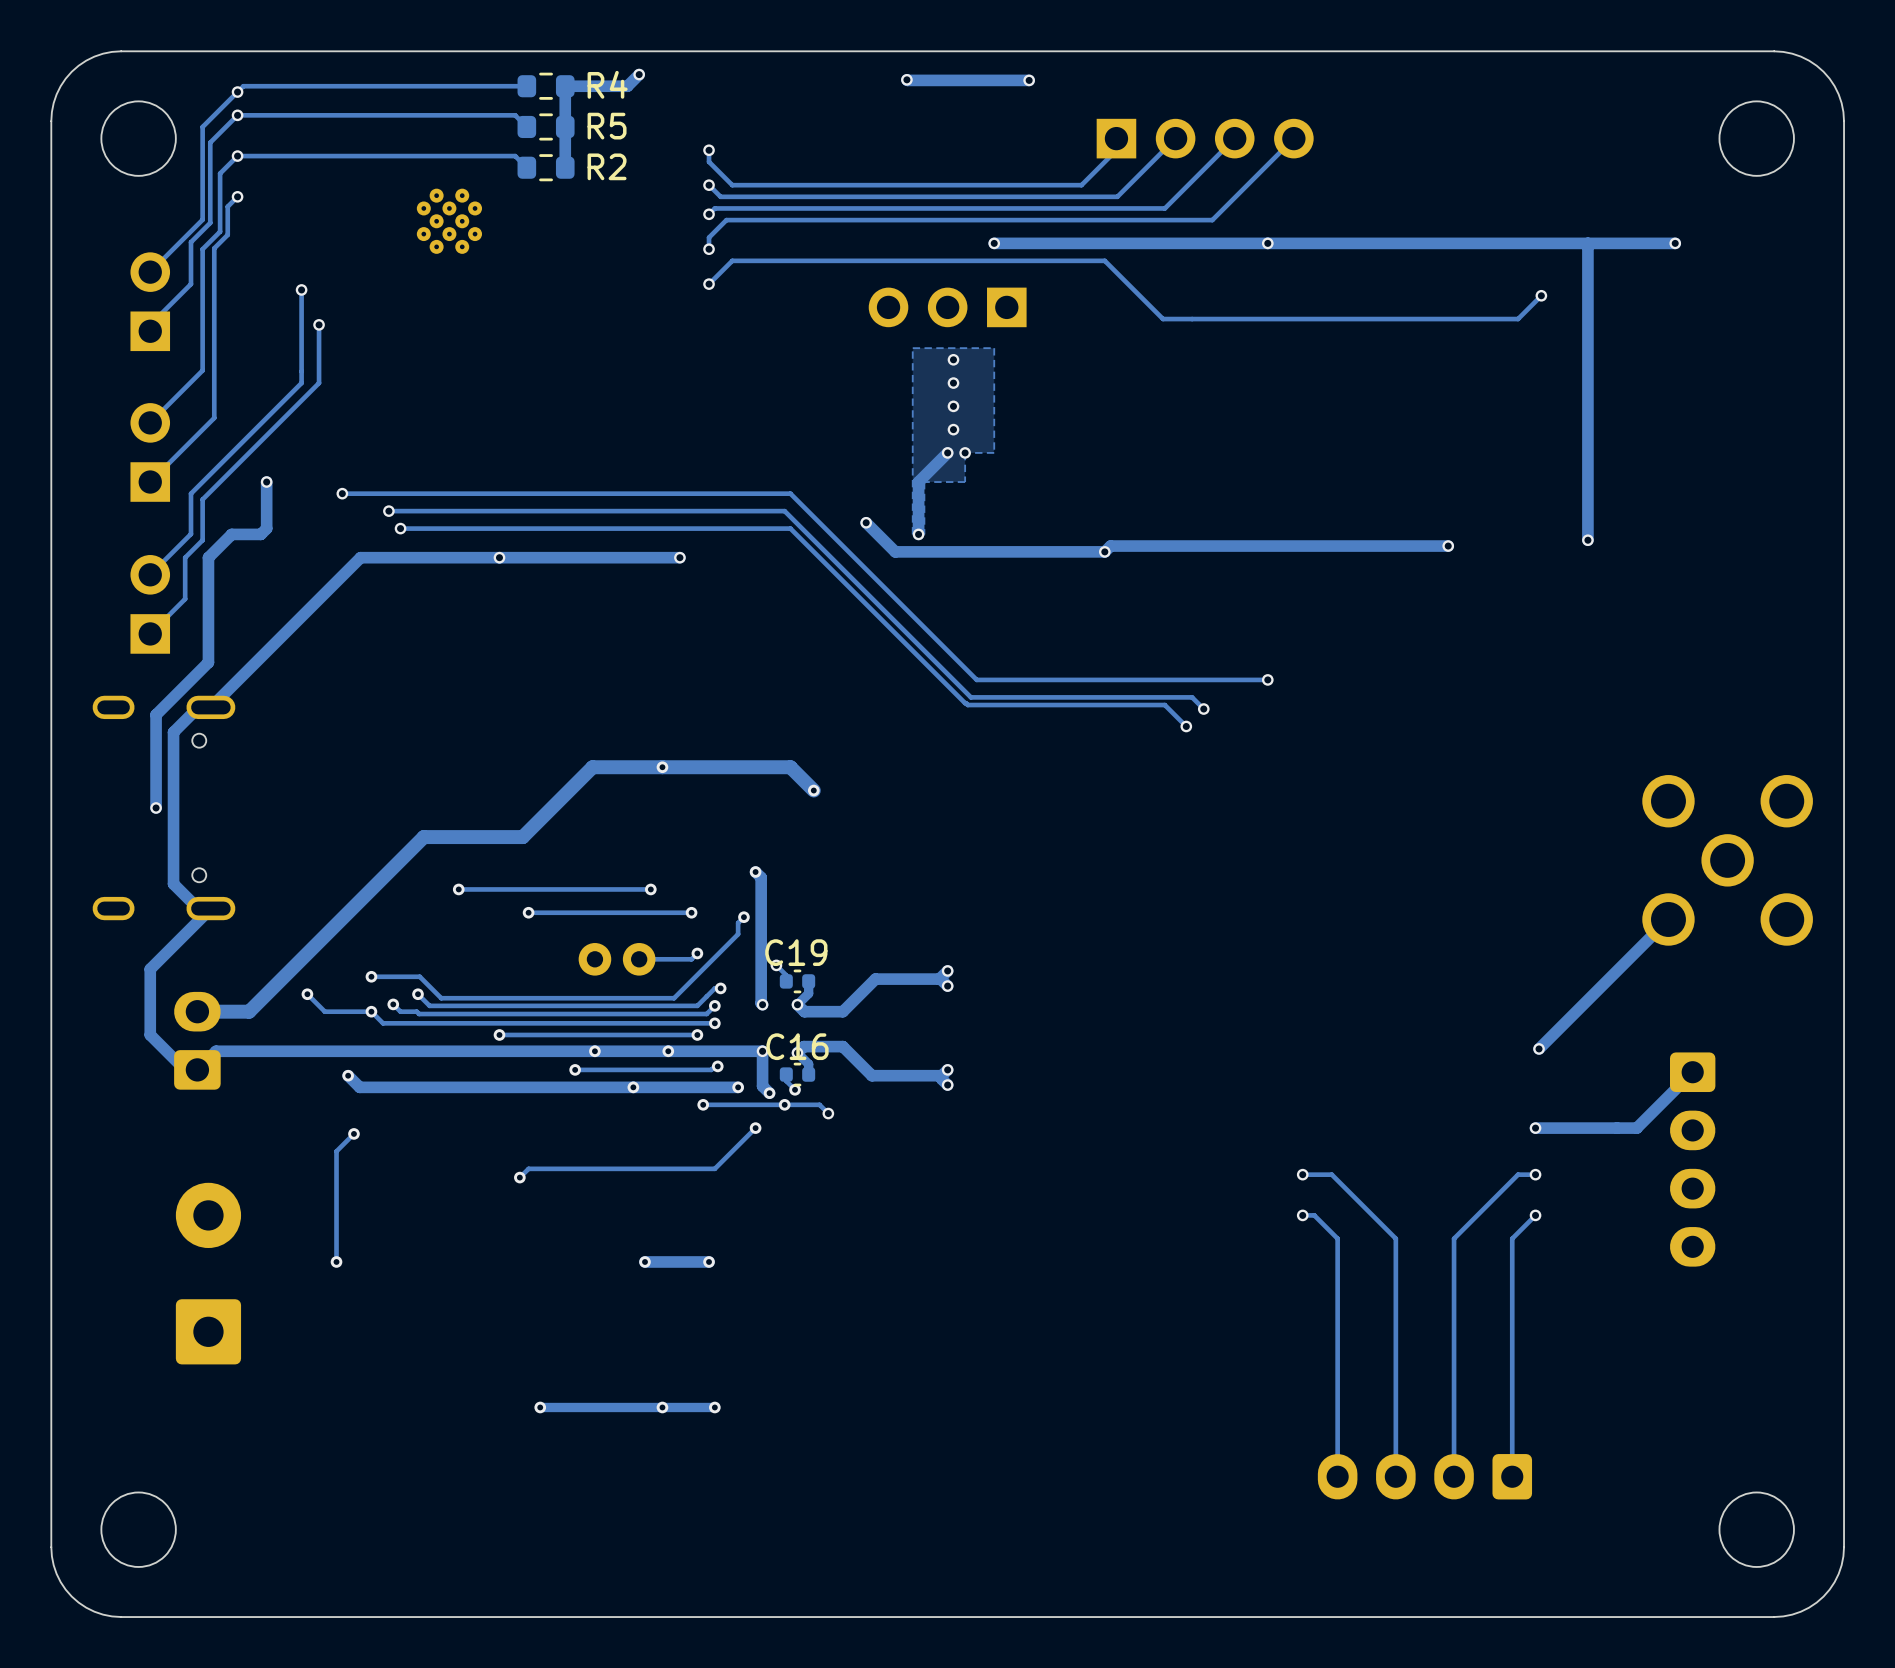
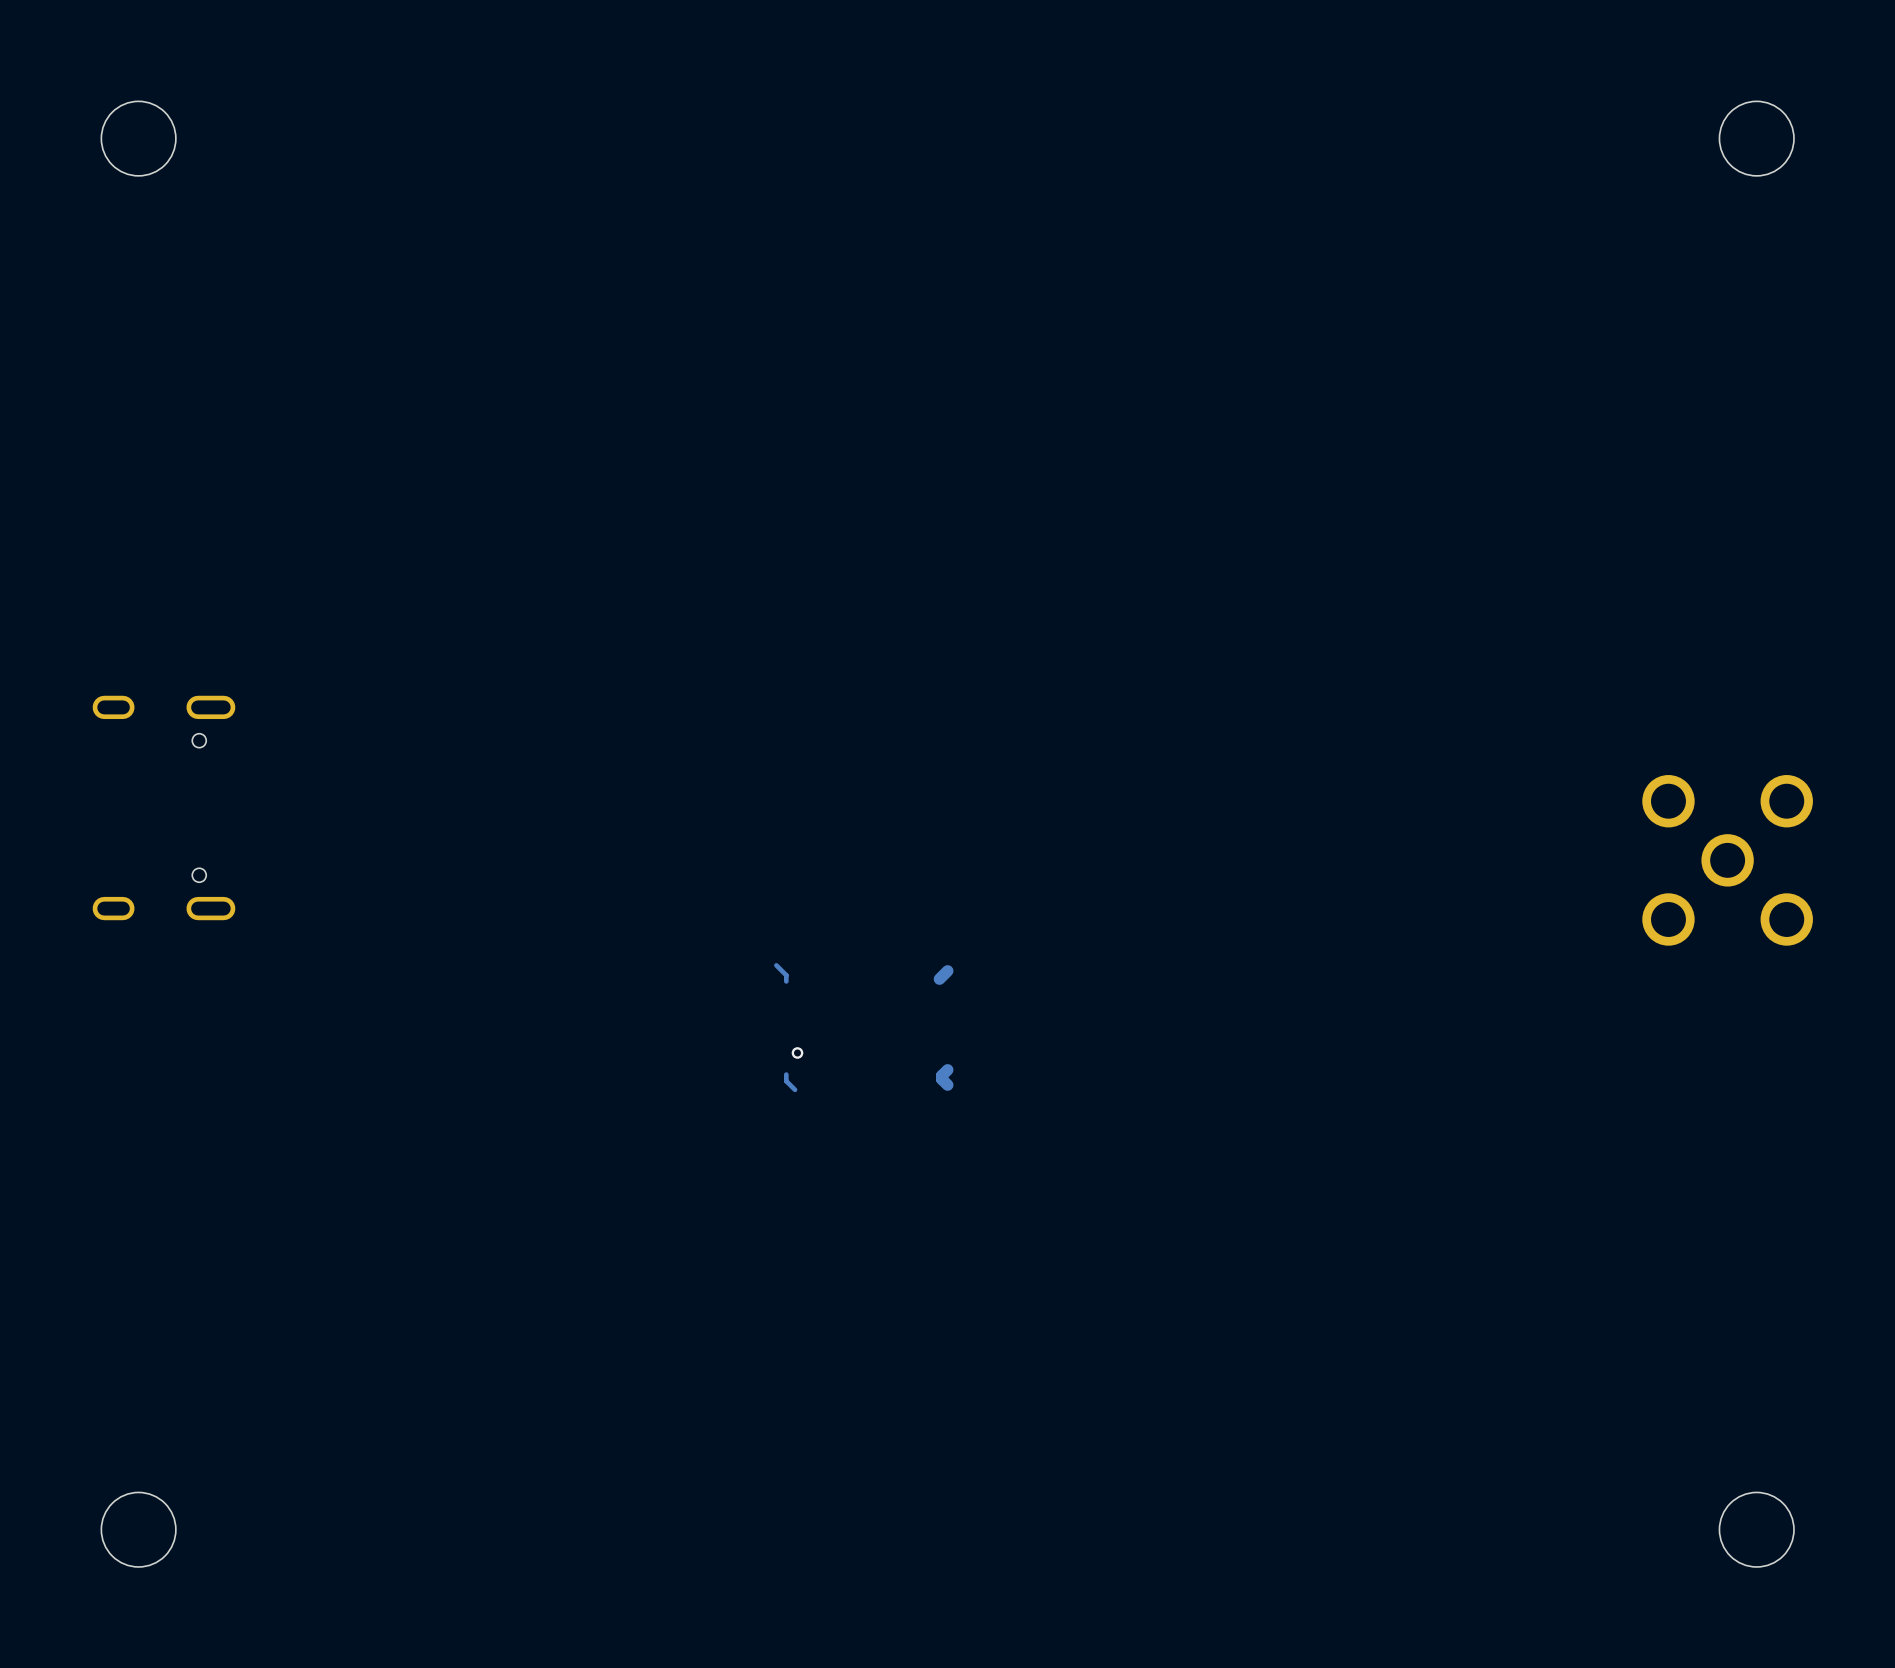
board edge: (1774, 51) (121, 51) (94, 56) (71, 71) (56, 94) (51, 121) (51, 1547) (56, 1573) (71, 1596) (94, 1611) (121, 1617) (1774, 1617) (1800, 1611) (1823, 1596) (1838, 1573) (1844, 1547) (1844, 121) (1838, 94) (1823, 71) (1800, 56) (1774, 51) -> none
track: (639, 74) (627, 86) (565, 86) (565, 167) -> none
via: (639, 74) -> none
track: (906, 79) (1029, 80) -> none
via: (906, 79) -> none
via: (1029, 80) -> none
track: (526, 86) (243, 86) (202, 126) (202, 219) (150, 272) -> none
R4: (546, 86) -> none
via: (237, 92) -> none
via: (237, 115) -> none
track: (526, 126) (515, 115) (237, 115) (210, 142) (210, 222) (191, 242) (191, 284) (150, 324) (150, 331) -> none
R5: (546, 126) -> none
track: (1116, 138) (1116, 150) (1081, 185) (732, 185) (709, 161) (709, 150) -> none
track: (1175, 138) (1117, 196) (720, 196) (709, 185) -> none
part: (1205, 138) -> none
track: (1234, 138) (1164, 208) (714, 208) (709, 214) -> none
track: (1293, 138) (1212, 220) (726, 220) (709, 237) (709, 249) -> none
via: (709, 150) -> none
via: (237, 156) -> none
track: (526, 167) (515, 156) (237, 156) (220, 173) (220, 231) (202, 249) (202, 370) (150, 422) -> none
R2: (546, 167) -> none
via: (709, 185) -> none
track: (237, 196) (227, 206) (227, 234) (214, 248) (214, 418) (150, 482) -> none
via: (237, 196) -> none
via: (709, 214) -> none
part: (449, 221) -> none
via: (994, 243) -> none
via: (1267, 243) -> none
track: (1587, 243) (1587, 540) -> none
track: (1675, 243) (994, 243) -> none
via: (1675, 243) -> none
via: (709, 249) -> none
track: (709, 284) (732, 260) (1104, 260) (1163, 319) (1518, 319) (1541, 295) -> none
via: (709, 284) -> none
track: (301, 289) (301, 383) (191, 493) (191, 534) (150, 574) -> none
via: (301, 289) -> none
via: (1541, 295) -> none
part: (150, 301) -> none
part: (947, 307) -> none
track: (319, 324) (319, 383) (202, 499) (202, 540) (185, 557) (185, 599) (150, 633) -> none
via: (319, 324) -> none
zone outline: (994, 348) (912, 348) (912, 534) (924, 534) (924, 482) (965, 482) (965, 452) (994, 452) (994, 348) -> none
via: (953, 359) -> none
via: (953, 383) -> none
via: (953, 406) -> none
via: (953, 429) -> none
part: (150, 452) -> none
track: (947, 452) (918, 482) (918, 534) -> none
via: (947, 452) -> none
via: (965, 452) -> none
track: (266, 482) (266, 528) (260, 534) (231, 534) (208, 557) (208, 662) (156, 714) (156, 807) -> none
via: (266, 482) -> none
track: (342, 493) (790, 493) (976, 679) (1267, 679) -> none
via: (342, 493) -> none
track: (388, 511) (784, 511) (970, 697) (1192, 697) (1203, 709) -> none
via: (388, 511) -> none
track: (866, 522) (895, 551) (1104, 551) (1110, 546) (1448, 546) -> none
via: (866, 522) -> none
track: (400, 528) (790, 528) (967, 705) (1164, 705) (1186, 726) -> none
via: (400, 528) -> none
via: (918, 534) -> none
via: (1587, 540) -> none
via: (1448, 546) -> none
via: (1104, 551) -> none
via: (499, 557) -> none
track: (679, 557) (360, 557) (210, 707) (198, 707) (173, 732) (173, 883) (198, 908) (210, 908) (150, 969) (150, 1034) (185, 1069) (197, 1069) (216, 1051) (762, 1051) (762, 1086) (769, 1093) -> none
via: (679, 557) -> none
part: (150, 604) -> none
via: (1267, 679) -> none
via: (1203, 709) -> none
via: (1186, 726) -> none
via: (662, 767) -> none
track: (813, 790) (790, 767) (592, 767) (522, 837) (423, 837) (249, 1011) (197, 1011) -> none
via: (813, 790) -> none
via: (156, 807) -> none
track: (755, 872) (761, 877) (762, 1004) -> none
via: (755, 872) -> none
via: (458, 889) -> none
track: (650, 889) (458, 889) -> none
via: (650, 889) -> none
via: (528, 912) -> none
track: (691, 912) (528, 912) -> none
via: (691, 912) -> none
track: (743, 917) (738, 923) (738, 934) (674, 998) (441, 998) (419, 976) (371, 976) -> none
via: (743, 917) -> none
track: (1668, 919) (1539, 1048) -> none
track: (697, 953) (691, 959) (639, 959) -> none
via: (697, 953) -> none
part: (617, 959) -> none
via: (776, 965) -> none
via: (947, 970) -> none
via: (371, 976) -> none
C19: (797, 981) -> none
track: (808, 981) (808, 993) (797, 1004) (804, 1011) (842, 1011) (875, 979) (940, 979) (947, 986) -> none
via: (947, 986) -> none
track: (720, 988) (714, 988) (697, 1005) (429, 1005) (418, 994) -> none
via: (720, 988) -> none
track: (307, 994) (324, 1011) (371, 1011) (383, 1023) (714, 1023) -> none
via: (307, 994) -> none
via: (418, 994) -> none
track: (393, 1004) (400, 1011) (416, 1011) (419, 1014) (706, 1014) (714, 1005) -> none
via: (393, 1004) -> none
via: (762, 1004) -> none
via: (797, 1004) -> none
via: (714, 1005) -> none
via: (371, 1011) -> none
via: (714, 1023) -> none
via: (499, 1034) -> none
track: (697, 1034) (499, 1034) -> none
via: (697, 1034) -> none
part: (197, 1040) -> none
via: (1539, 1048) -> none
via: (594, 1051) -> none
via: (668, 1051) -> none
via: (762, 1051) -> none
track: (717, 1066) (711, 1069) (575, 1069) -> none
via: (717, 1066) -> none
via: (575, 1069) -> none
via: (947, 1069) -> none
track: (1692, 1072) (1636, 1128) (1535, 1128) -> none
C16: (797, 1074) -> none
track: (808, 1074) (808, 1064) (797, 1052) (803, 1046) (842, 1046) (872, 1075) (941, 1075) -> none
track: (348, 1075) (359, 1087) (738, 1087) -> none
via: (348, 1075) -> none
via: (947, 1085) -> none
via: (633, 1087) -> none
via: (738, 1087) -> none
via: (795, 1089) -> none
via: (769, 1093) -> none
track: (703, 1104) (819, 1104) (828, 1113) -> none
via: (703, 1104) -> none
via: (784, 1104) -> none
via: (828, 1113) -> none
track: (755, 1128) (714, 1168) (528, 1168) (519, 1177) -> none
via: (755, 1128) -> none
via: (1535, 1128) -> none
track: (353, 1133) (336, 1151) (336, 1261) -> none
via: (353, 1133) -> none
part: (1692, 1159) -> none
track: (1302, 1174) (1331, 1174) (1395, 1238) (1395, 1476) -> none
via: (1302, 1174) -> none
track: (1535, 1174) (1518, 1174) (1454, 1238) (1454, 1476) -> none
via: (1535, 1174) -> none
via: (519, 1177) -> none
track: (1302, 1215) (1314, 1215) (1337, 1238) (1337, 1476) -> none
via: (1302, 1215) -> none
track: (1535, 1215) (1512, 1238) (1512, 1476) -> none
via: (1535, 1215) -> none
via: (336, 1261) -> none
via: (645, 1261) -> none
track: (709, 1261) (645, 1261) -> none
via: (709, 1261) -> none
part: (208, 1273) -> none
via: (540, 1407) -> none
via: (662, 1407) -> none
track: (714, 1407) (540, 1407) -> none
via: (714, 1407) -> none
part: (1424, 1476) -> none

